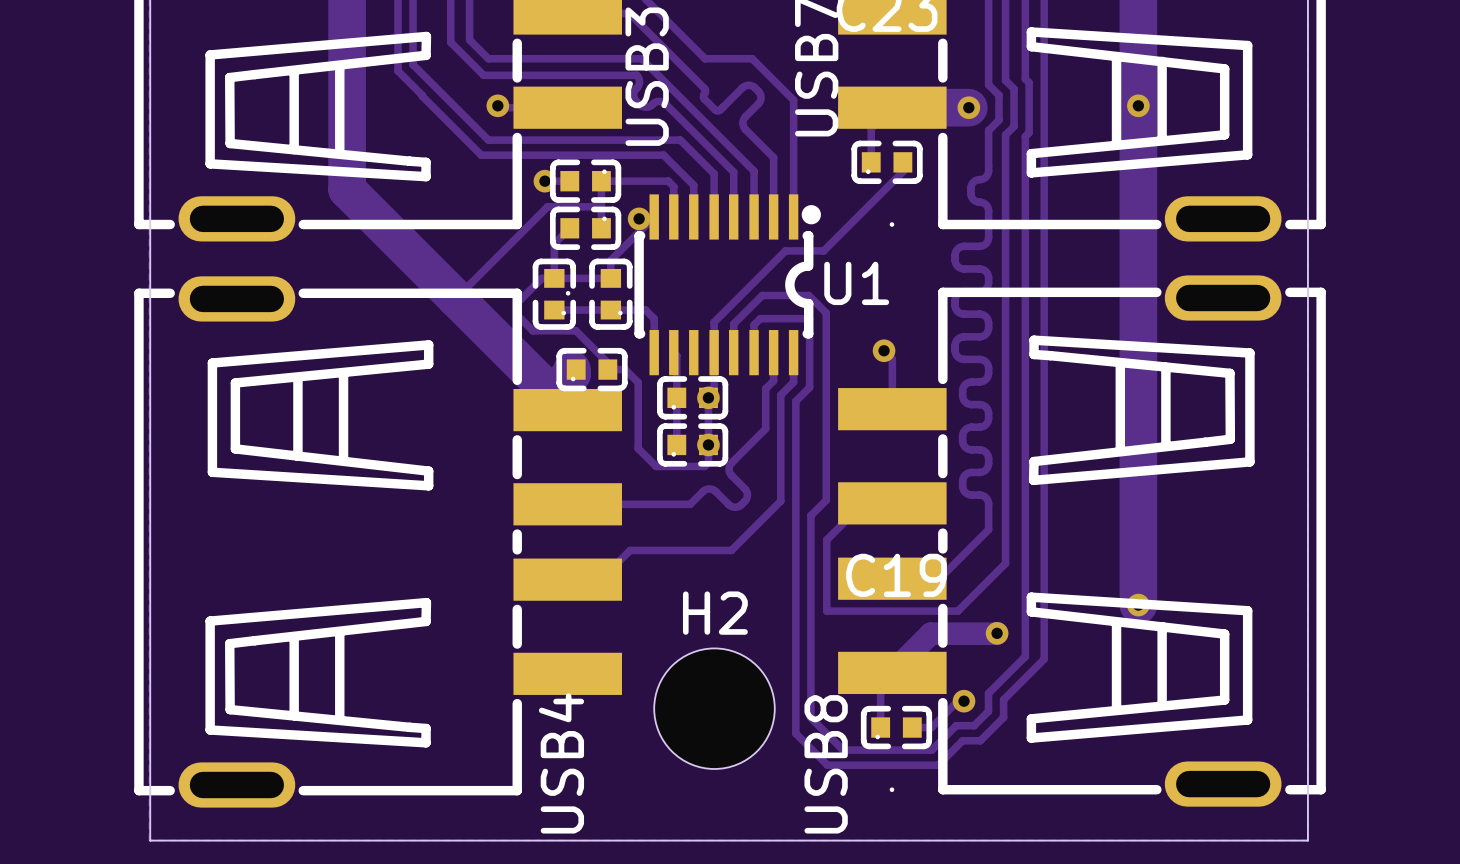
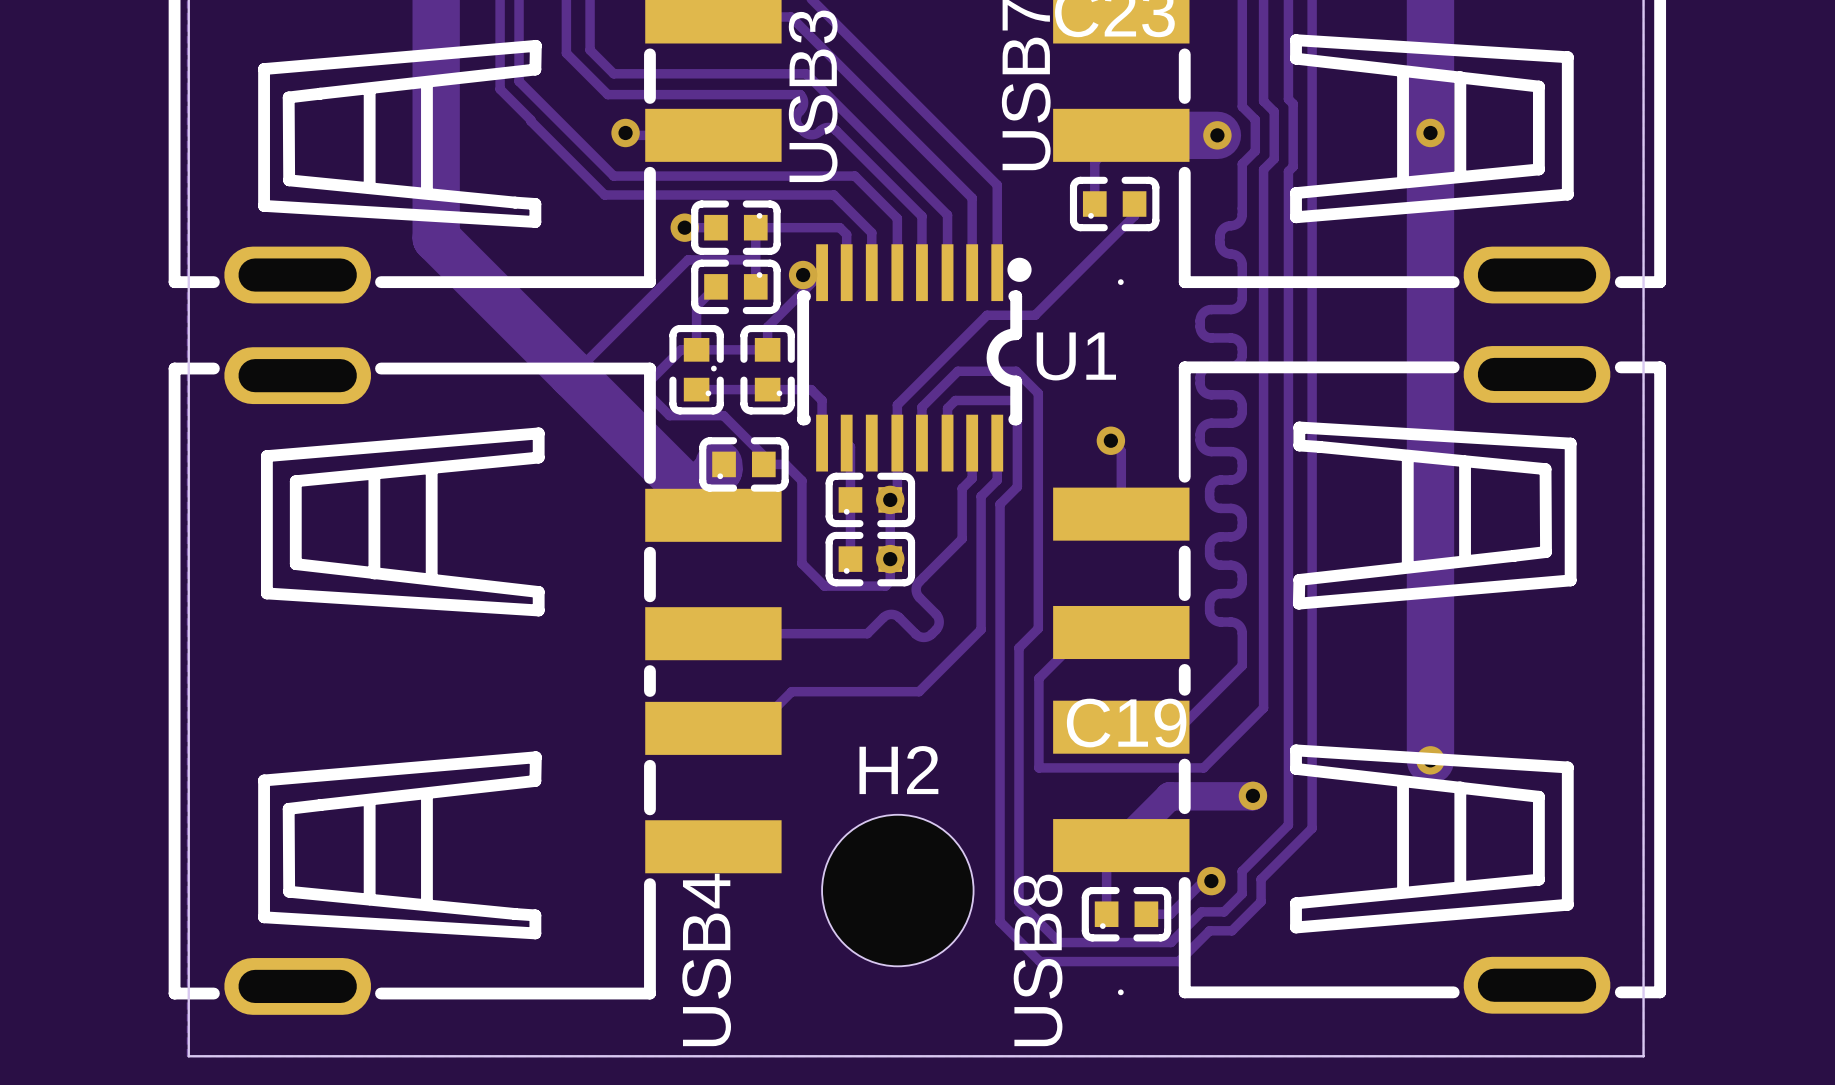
track: (705, 58) (752, 58) (793, 100) (793, 147) -> (885, 73) (997, 185)
track: (704, 88) (703, 98) (717, 110) (743, 86) (749, 85) (755, 87) (760, 93) (760, 99) (743, 119) (742, 124) (745, 129) -> (885, 111) (936, 162)

